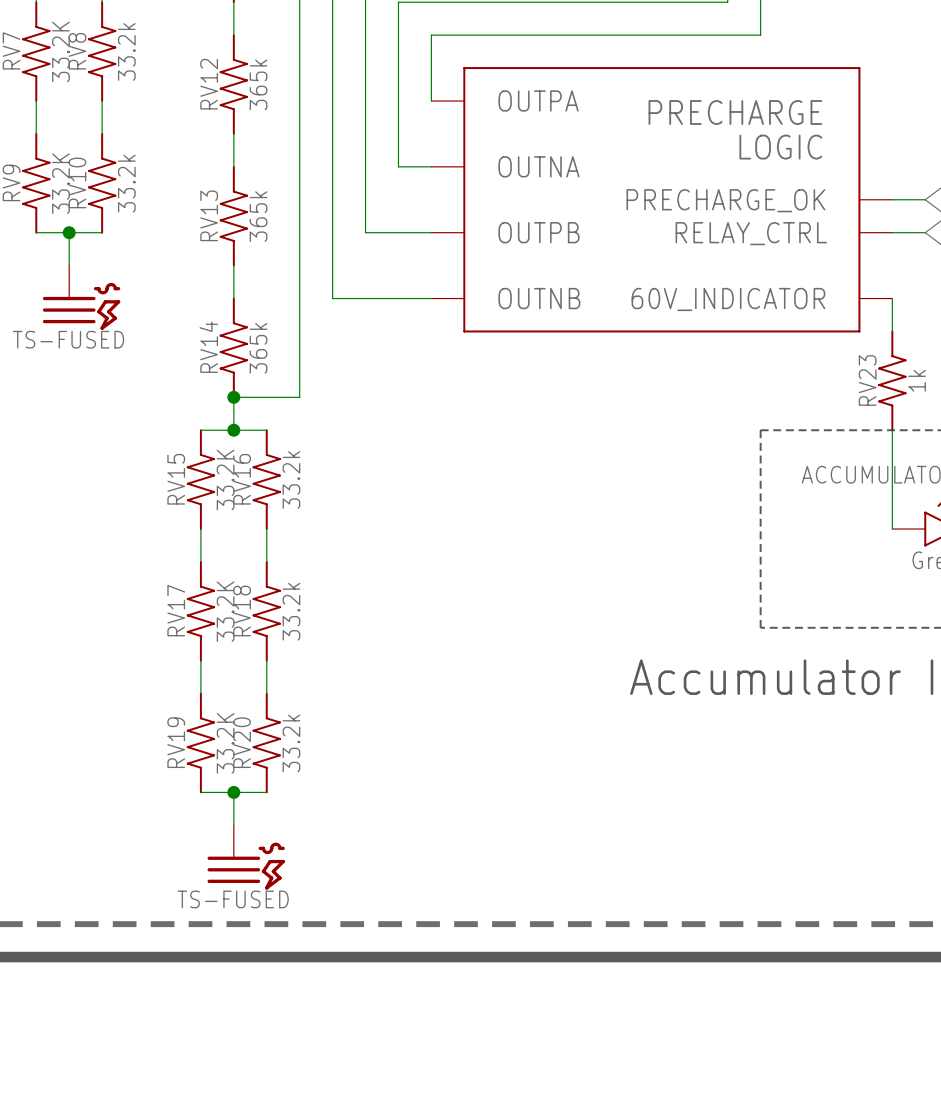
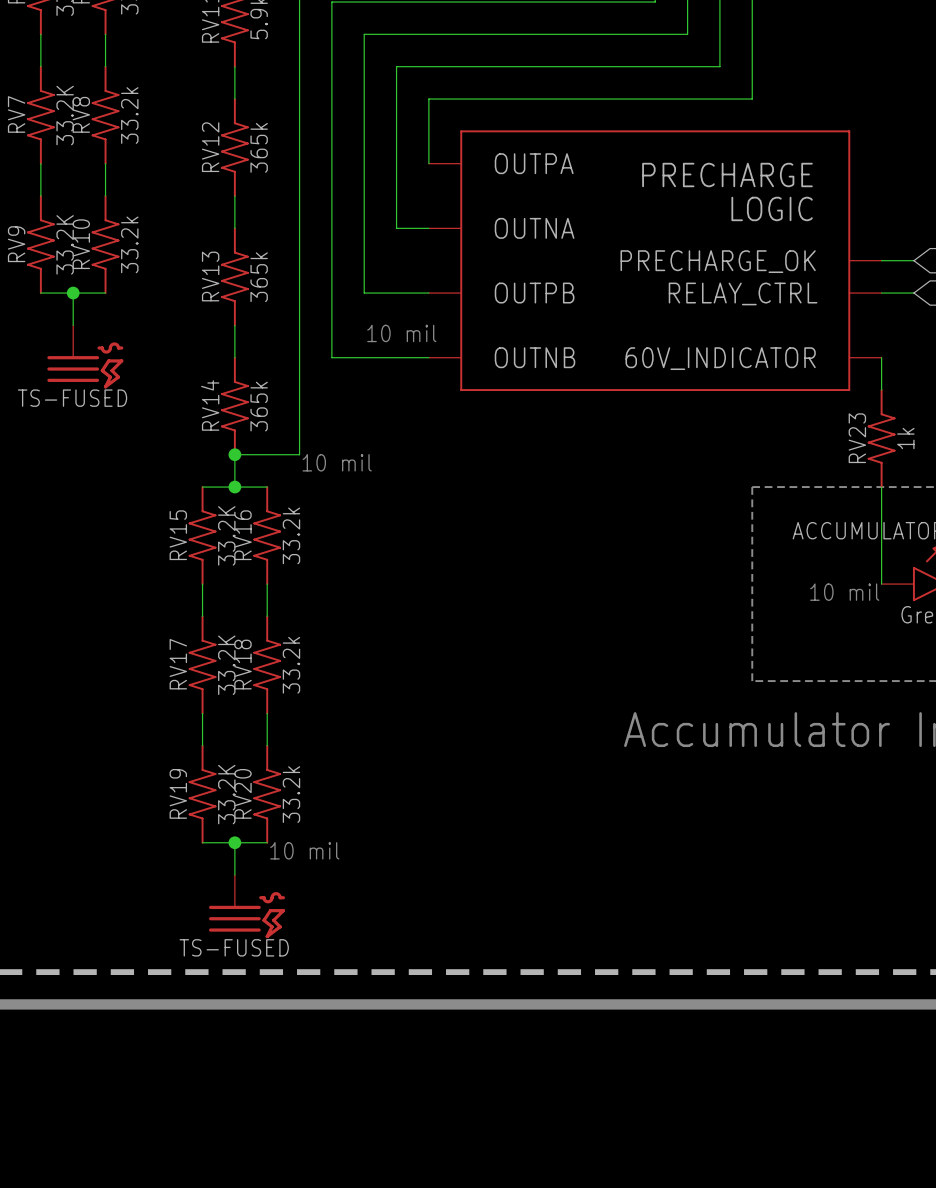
text: none -> 10 mil (401, 333)
text: none -> 10 mil (337, 462)
text: none -> 10 mil (844, 592)
text: none -> 10 mil (304, 850)

